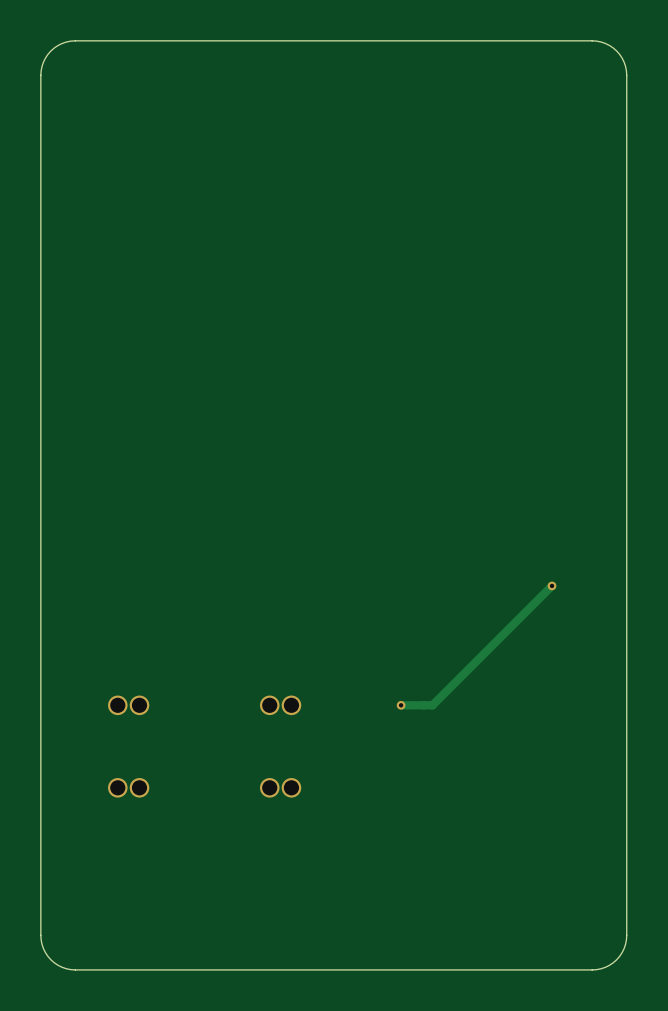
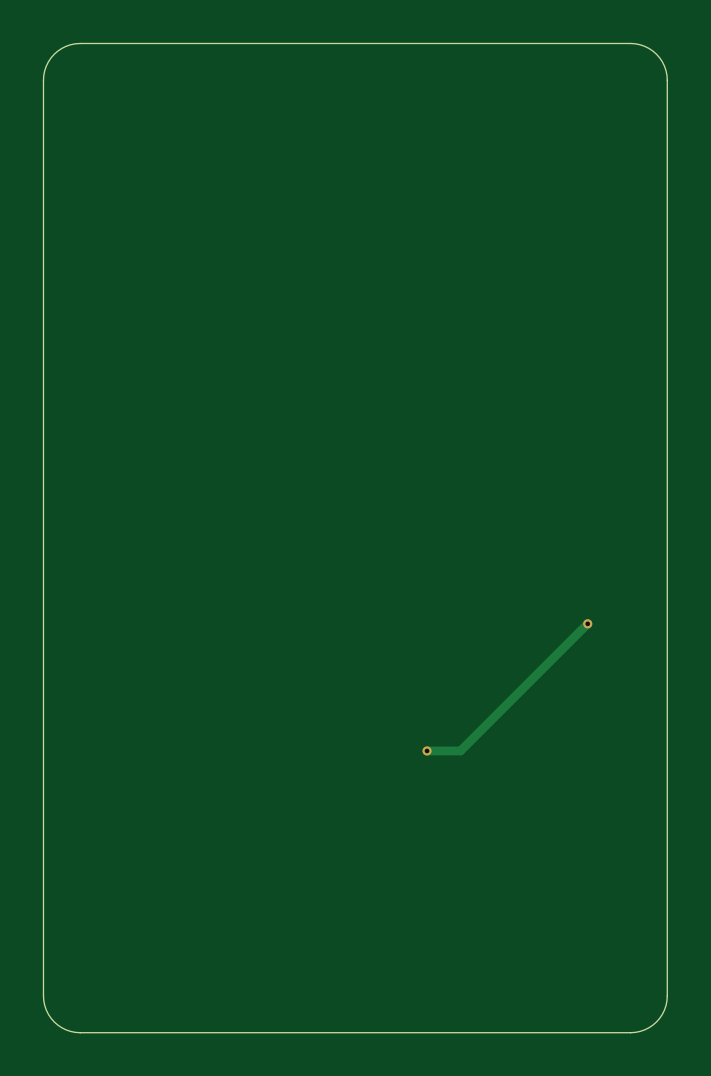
via: (117, 705) -> none
via: (139, 705) -> none
via: (269, 705) -> none
via: (291, 705) -> none
via: (117, 787) -> none
via: (139, 787) -> none
via: (269, 787) -> none
via: (291, 787) -> none

